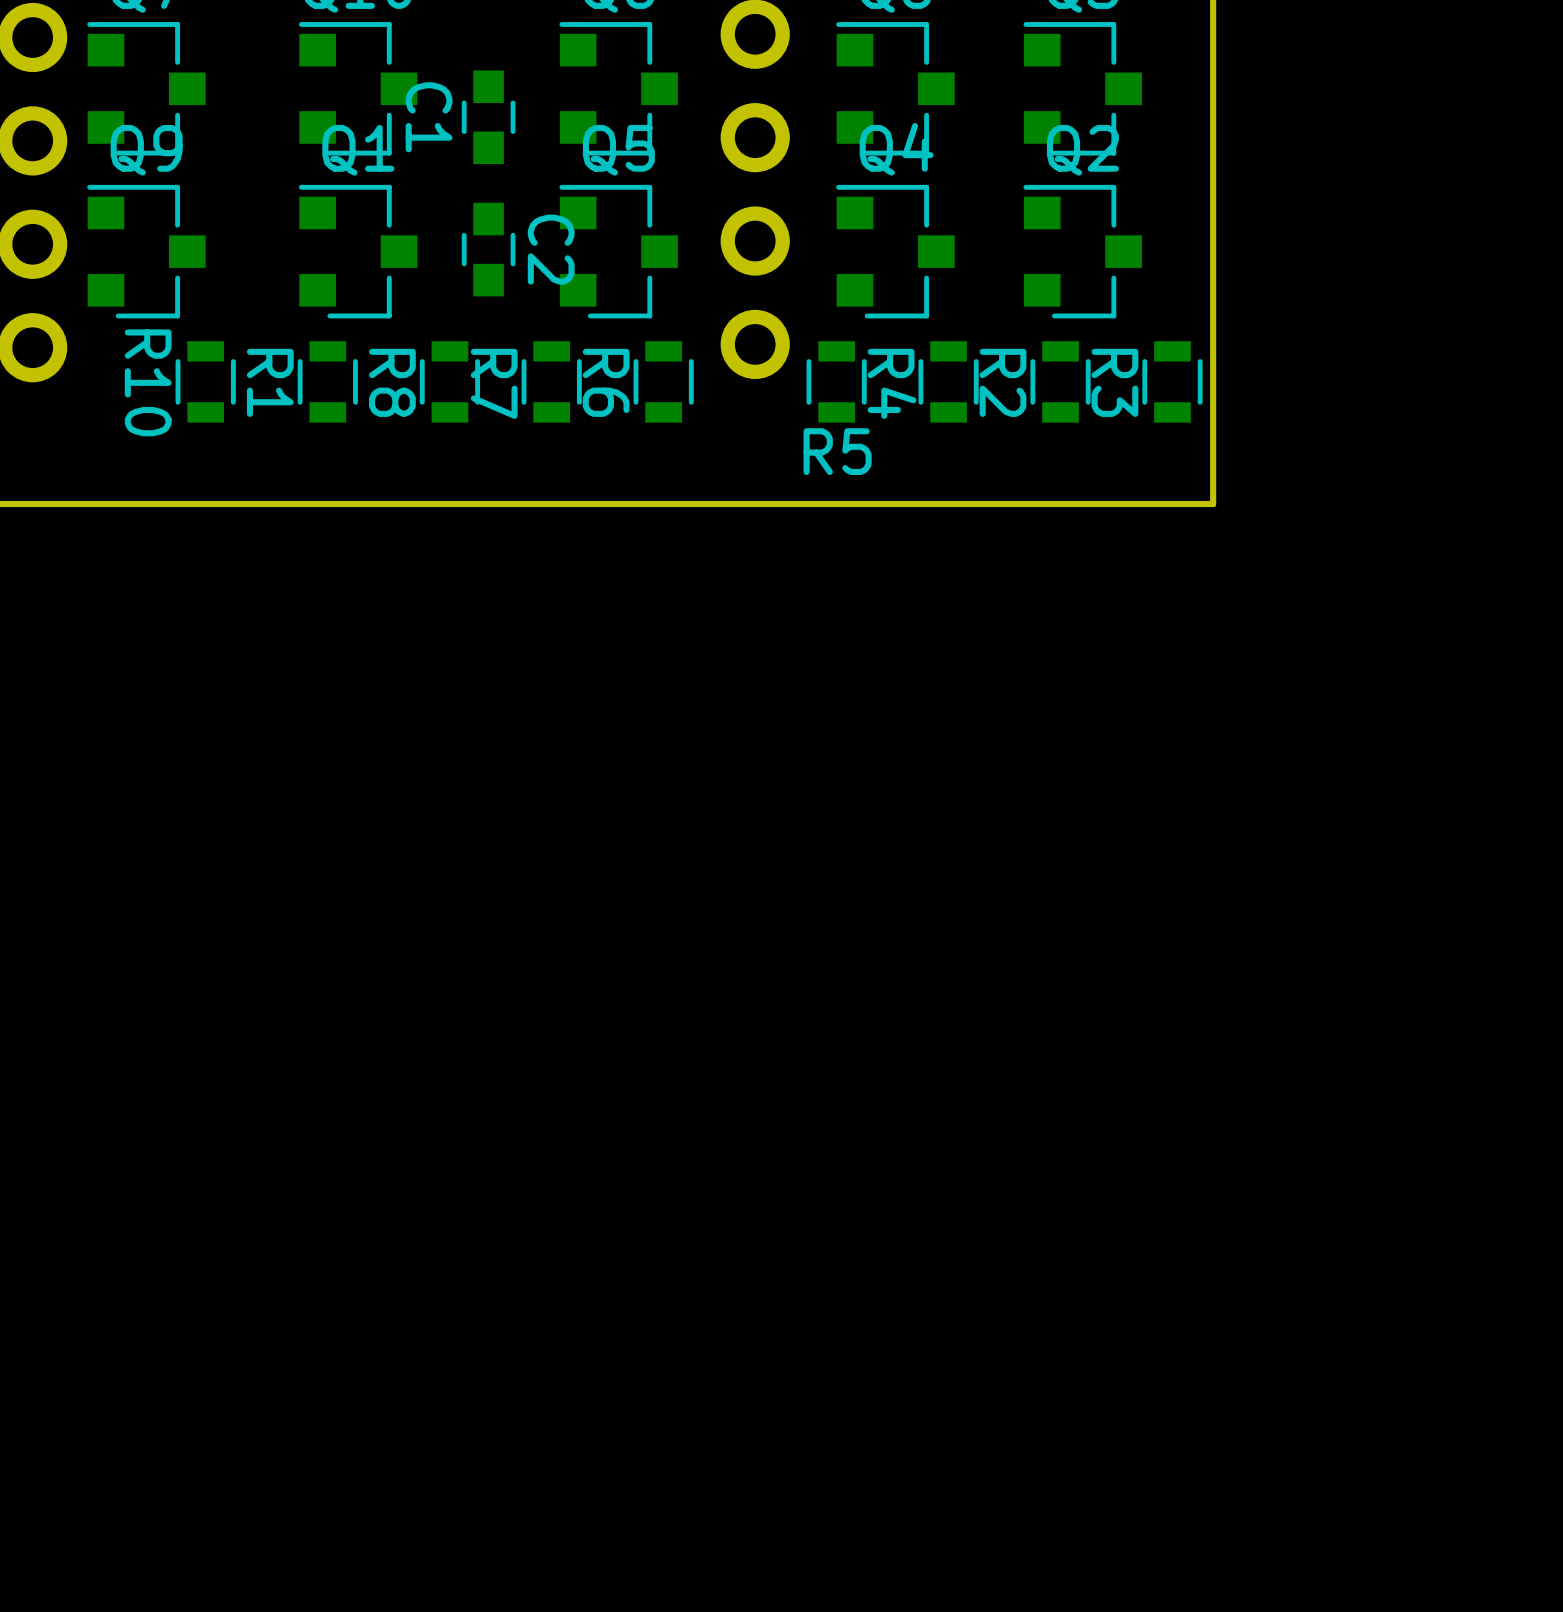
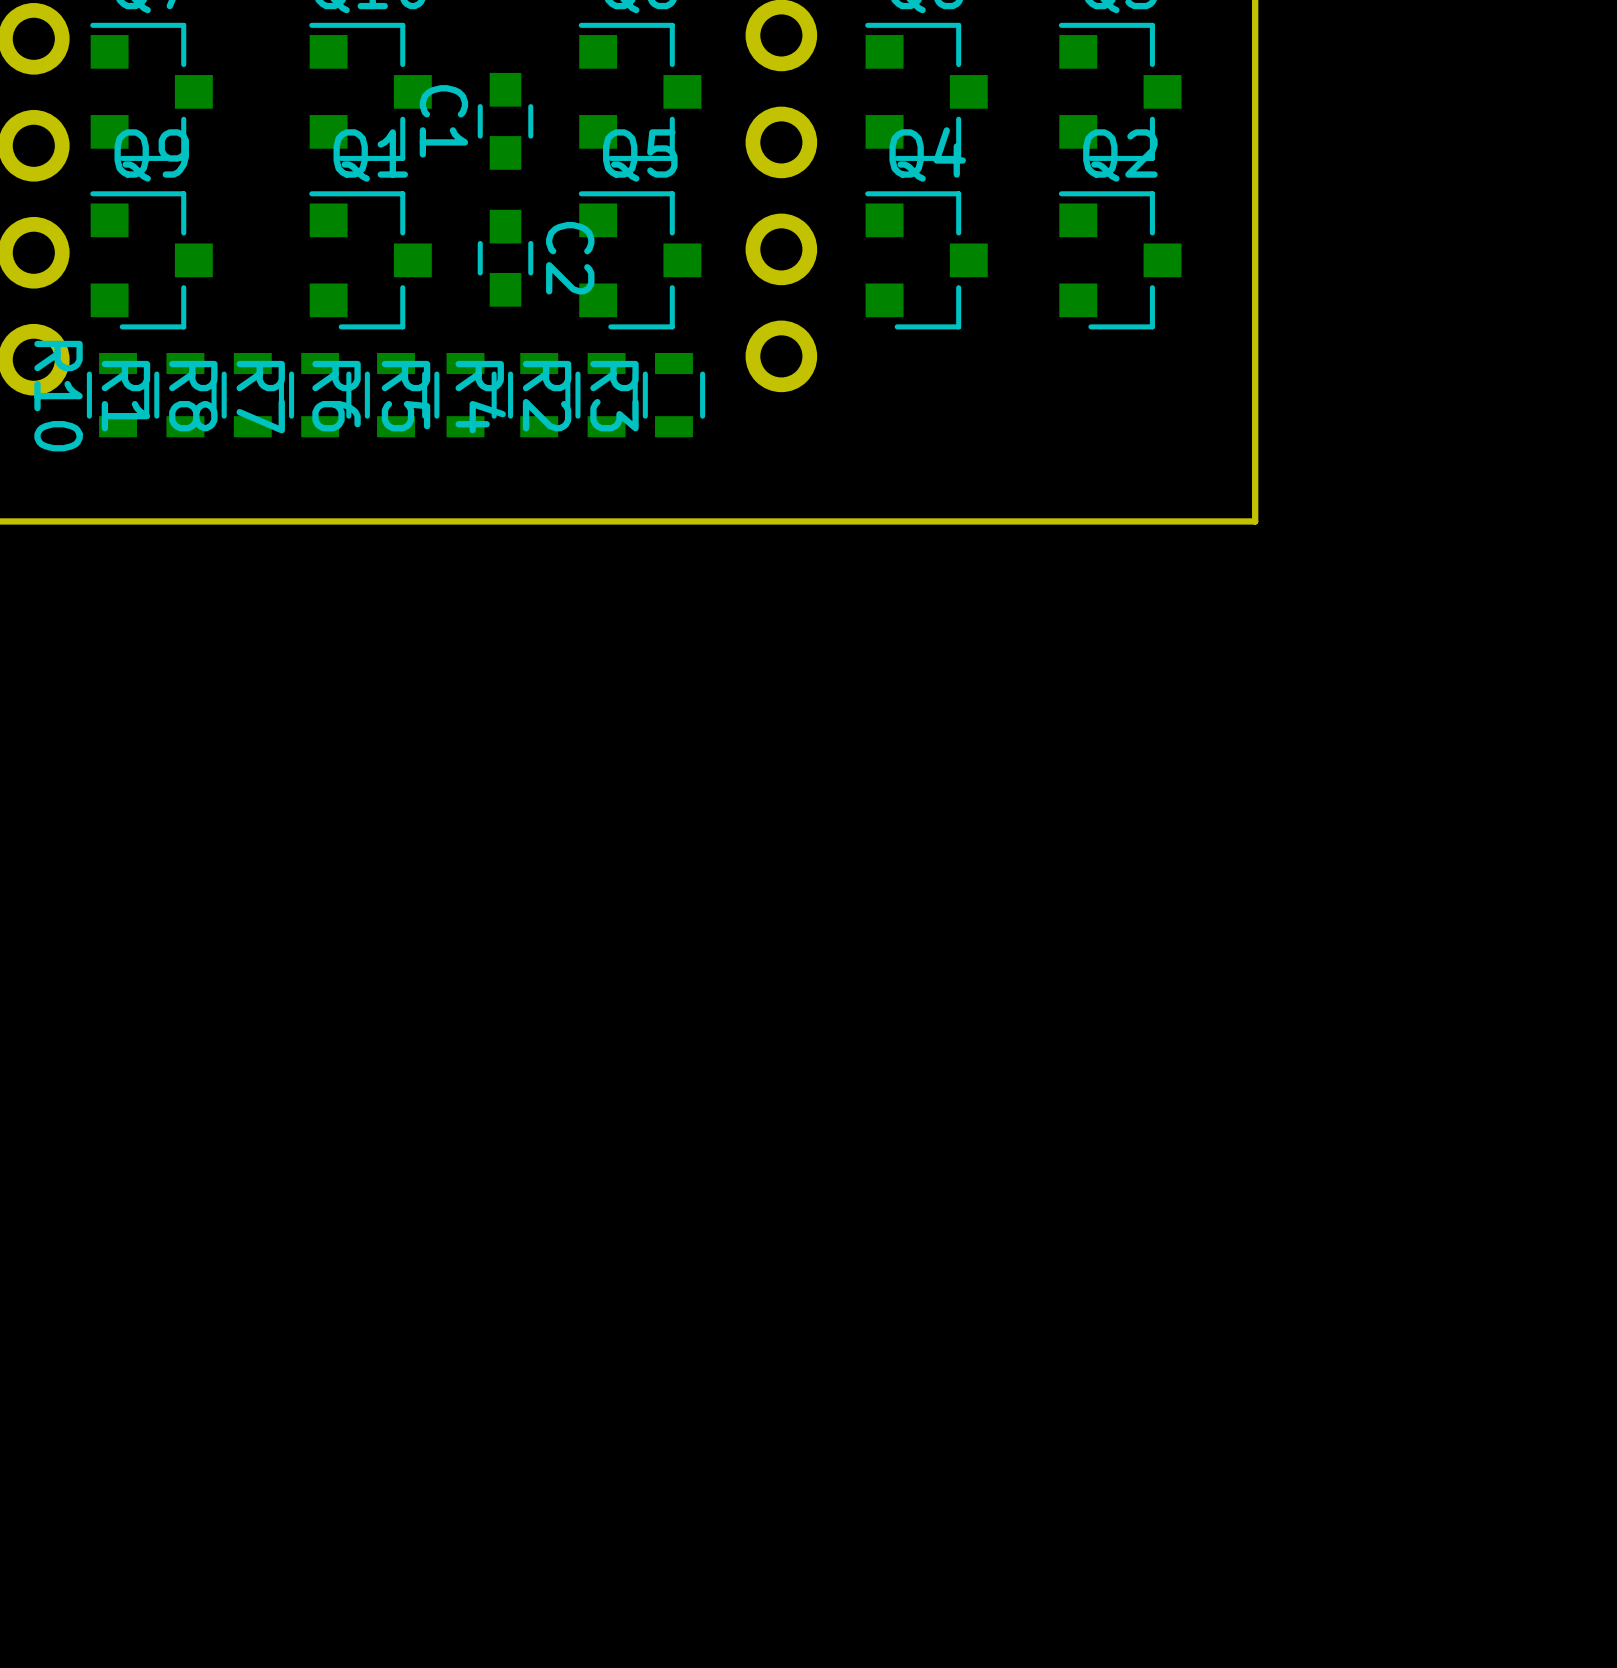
R10 position: (205, 381) -> (118, 395)
R8: none -> (252, 395)
R1 position: (327, 381) -> (185, 395)
R7 position: (551, 381) -> (320, 395)
R6 position: (663, 381) -> (396, 395)
R5: (836, 381) -> none
R4 position: (948, 381) -> (539, 395)
R2 position: (1060, 381) -> (606, 395)
R3 position: (1172, 381) -> (673, 395)
R8 name: R8 (392, 382) -> R5 (406, 396)

